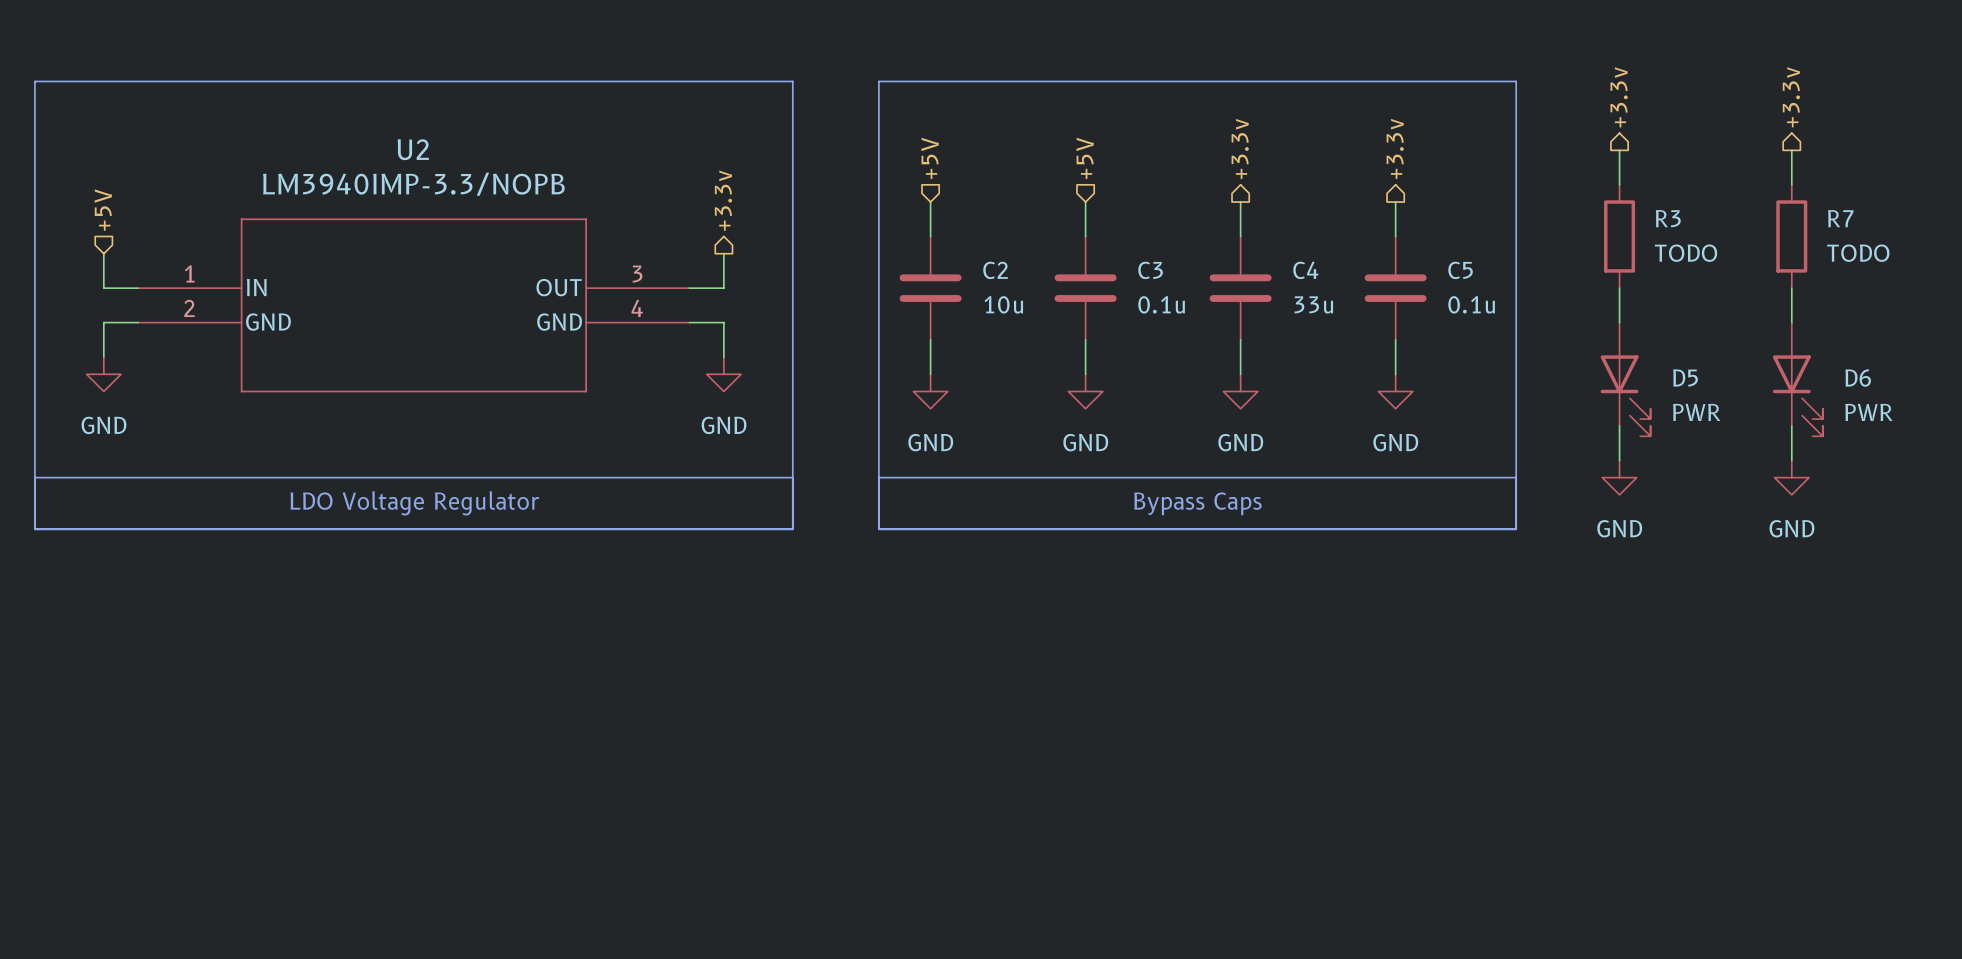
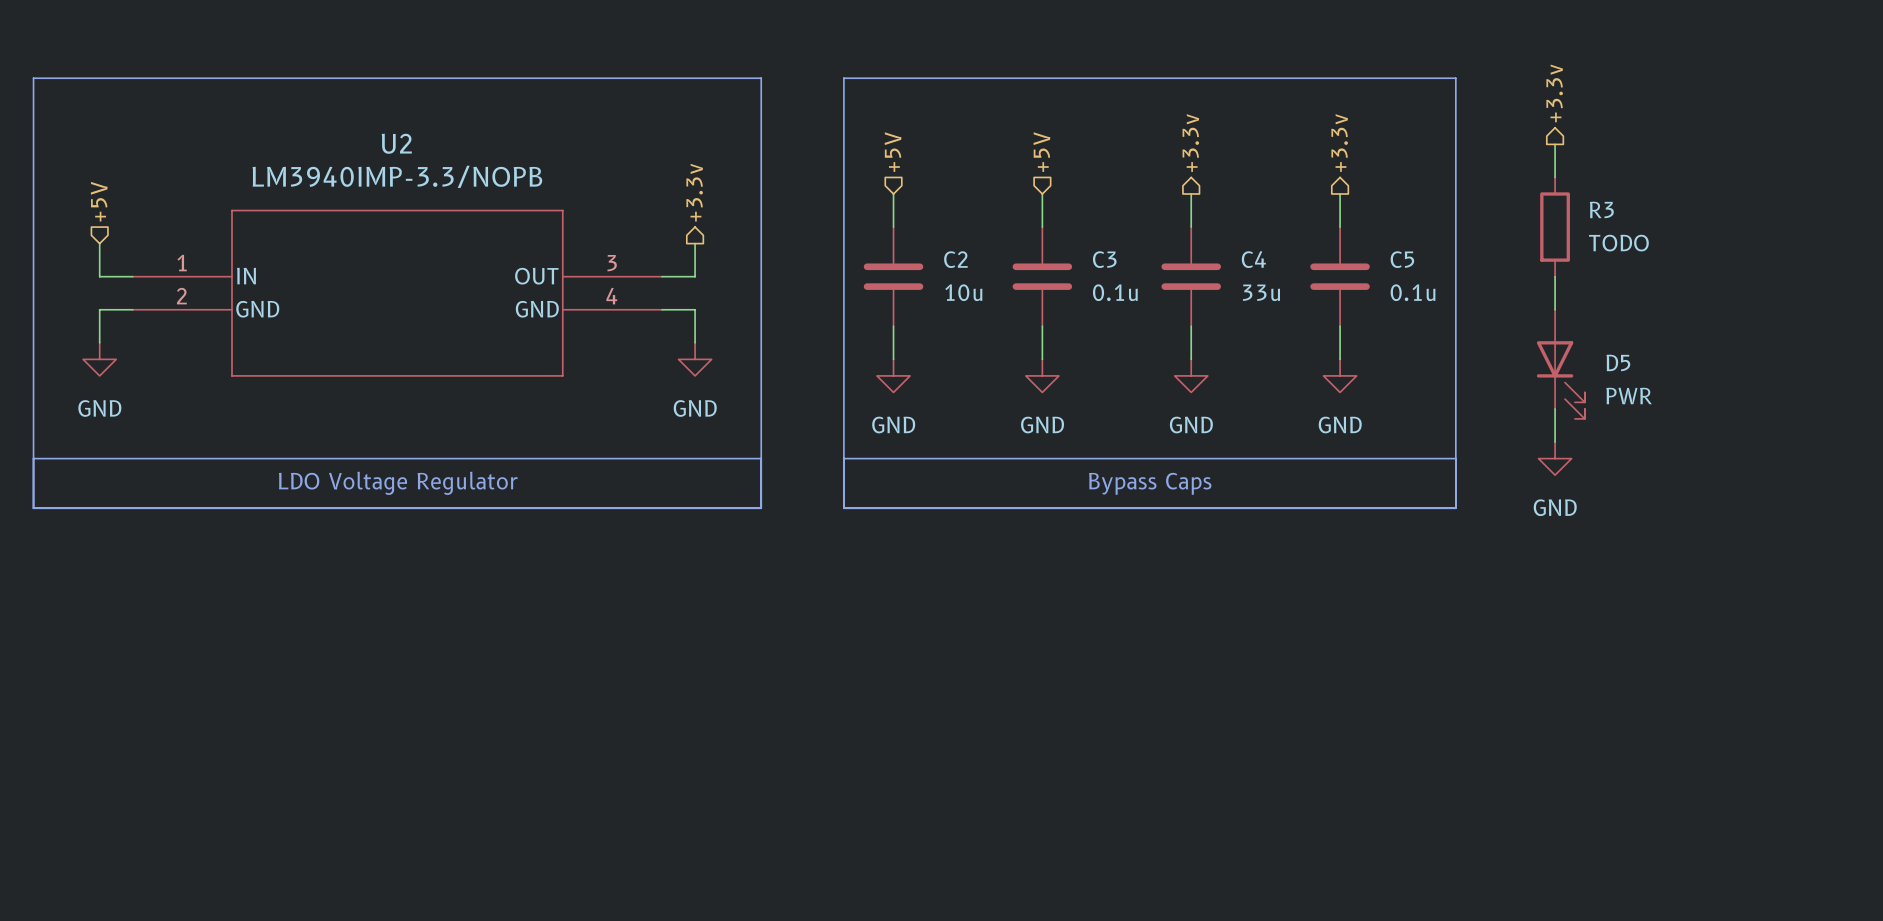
hierarchical label: +3.3v (1791, 97) -> none
wire: (1791, 150) (1791, 184) -> none
R7: TODO (1791, 236) -> none
wire: (1791, 288) (1791, 322) -> none
D6: PWR (1797, 379) -> none
wire: (1791, 425) (1791, 460) -> none
power symbol: GND (1791, 477) -> none

